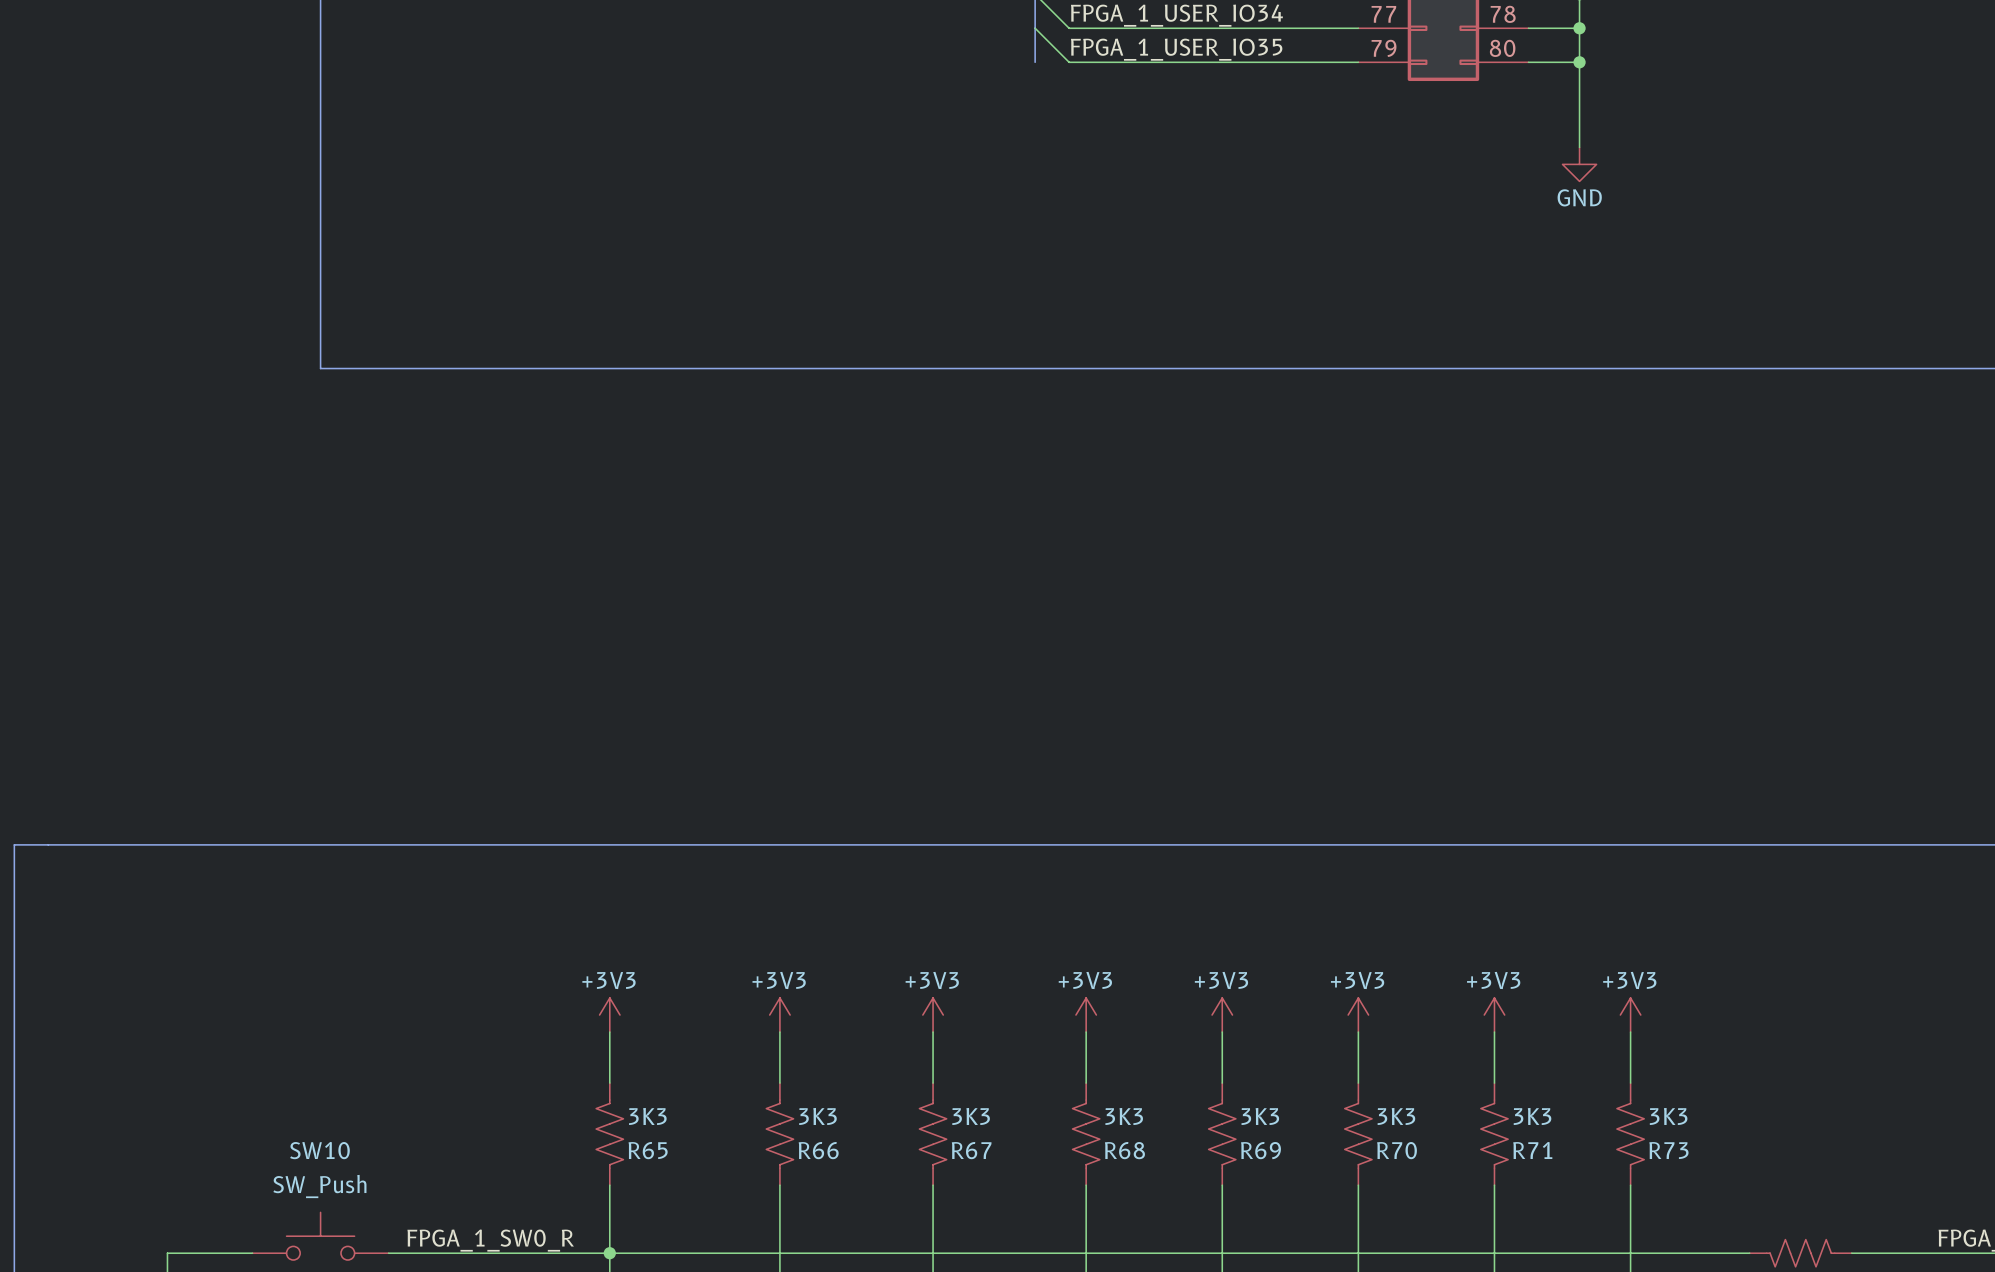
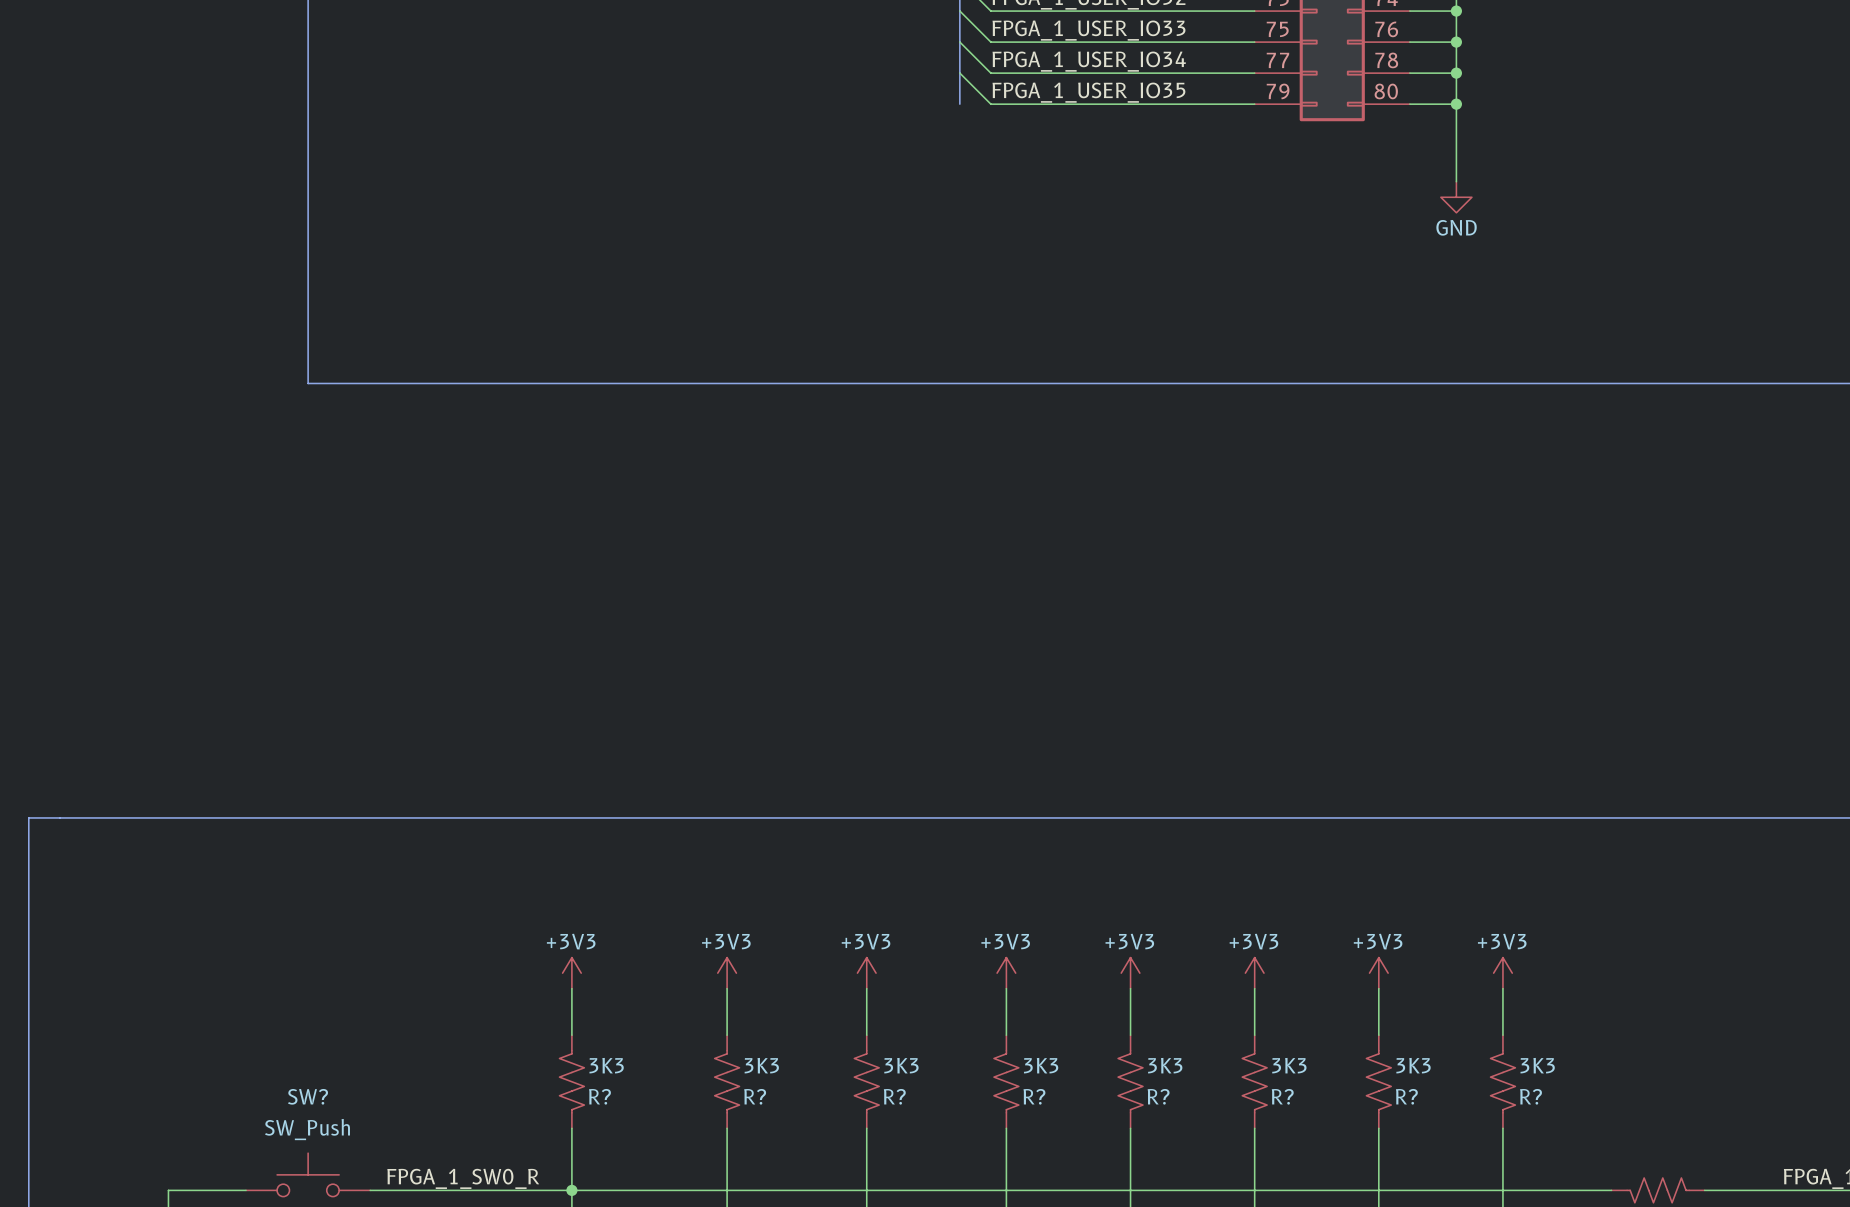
SW10 name: SW10 (319, 1150) -> SW? (308, 1096)
R65 name: R65 (648, 1150) -> R? (599, 1096)
R66 name: R66 (818, 1150) -> R? (755, 1096)
R67 name: R67 (971, 1150) -> R? (894, 1096)
R68 name: R68 (1124, 1150) -> R? (1034, 1096)
R69 name: R69 (1260, 1150) -> R? (1158, 1096)
R70 name: R70 (1397, 1150) -> R? (1282, 1096)
R71 name: R71 (1532, 1150) -> R? (1406, 1096)
R73 name: R73 (1668, 1150) -> R? (1531, 1096)

